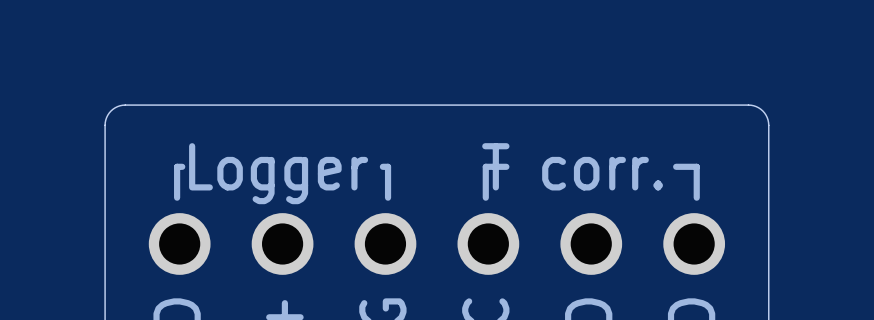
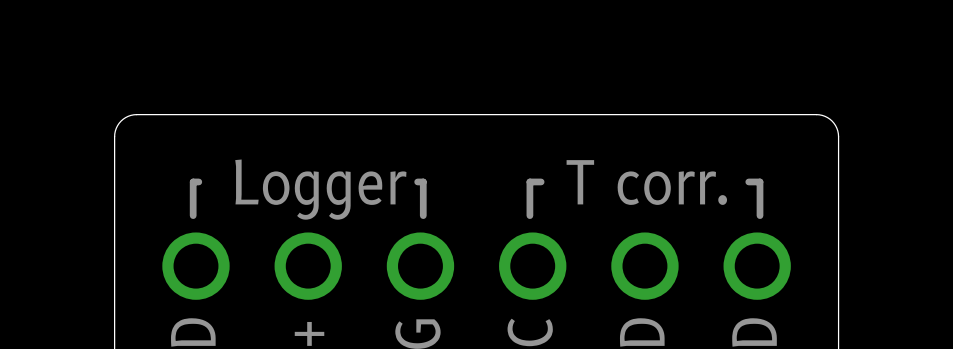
line: (506, 166) (496, 166) -> none
line: (686, 166) (676, 166) -> none

